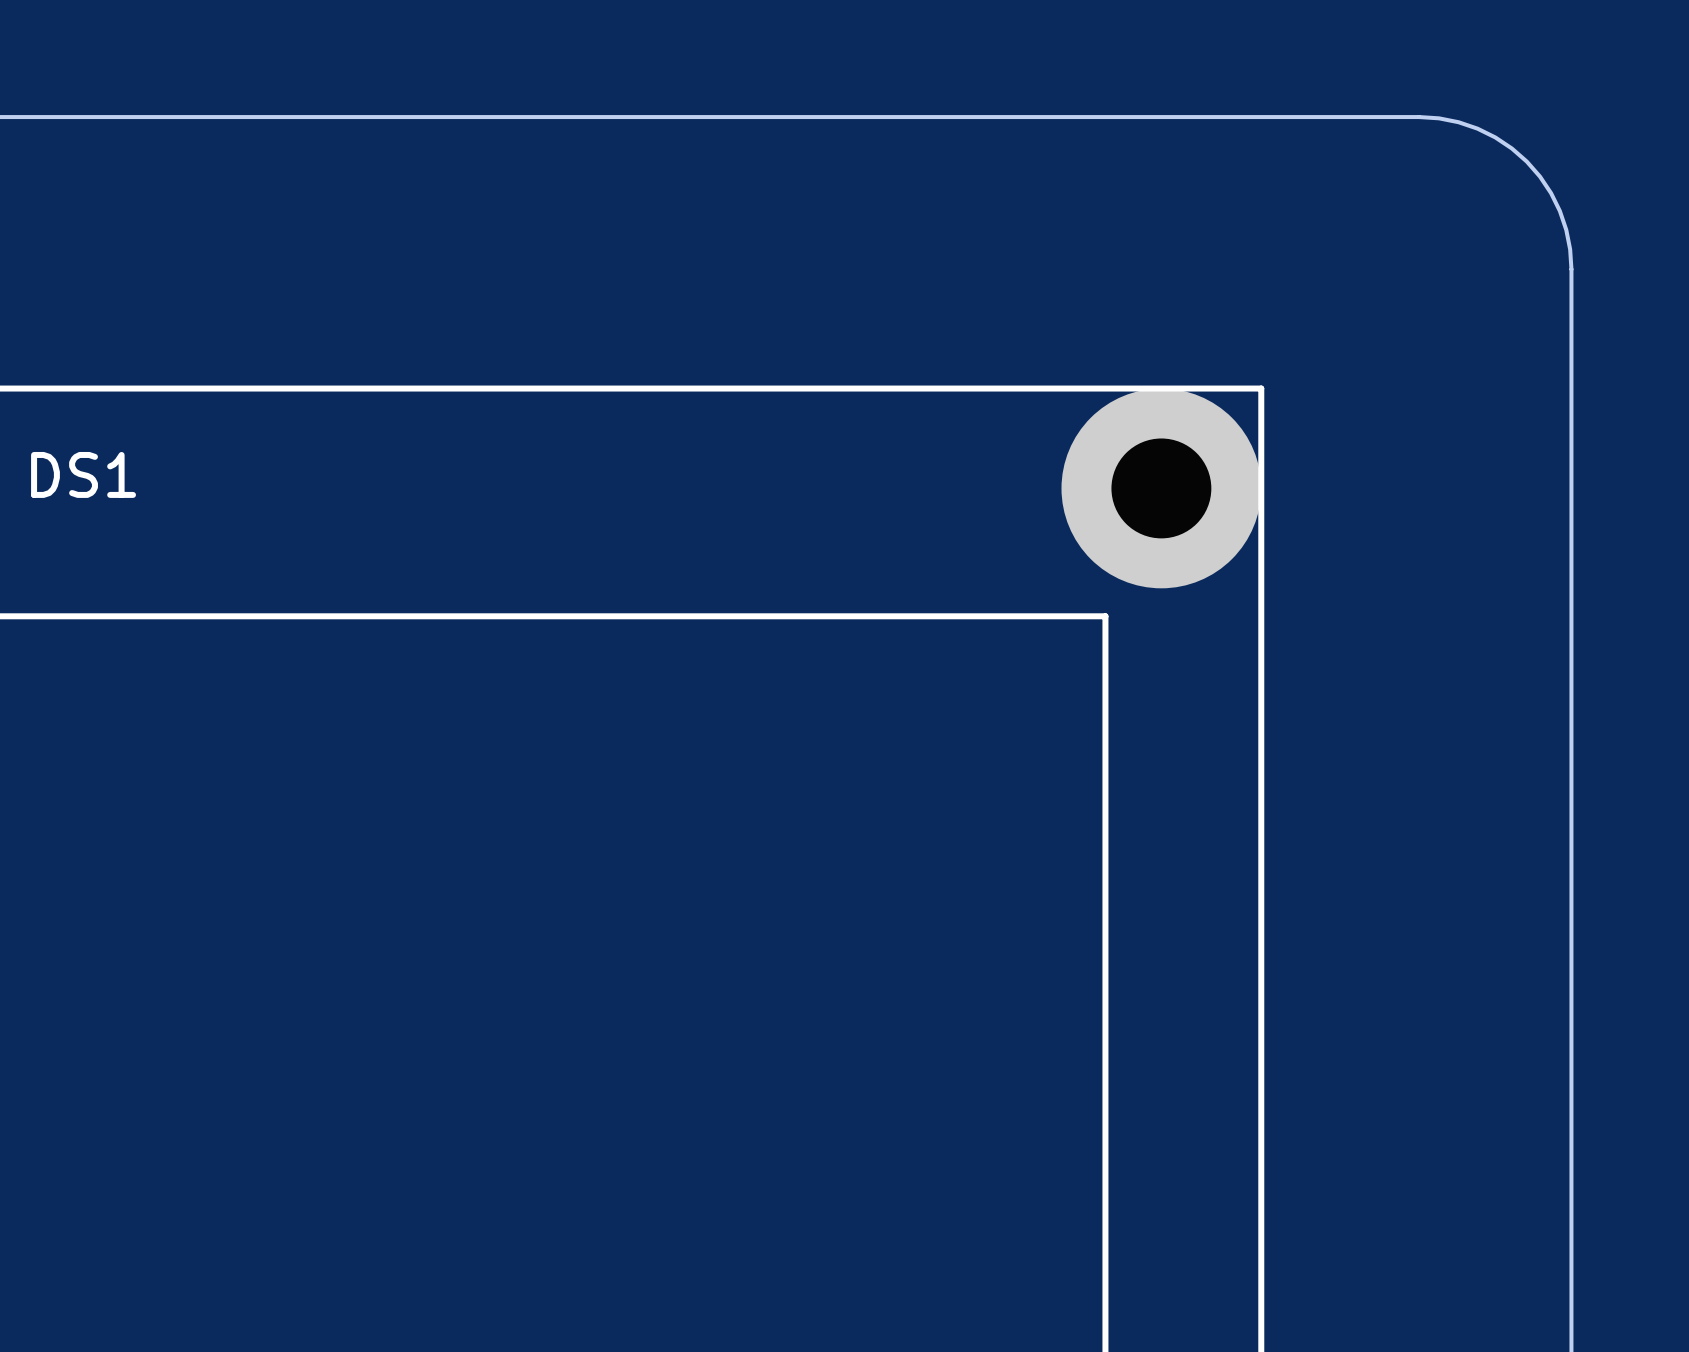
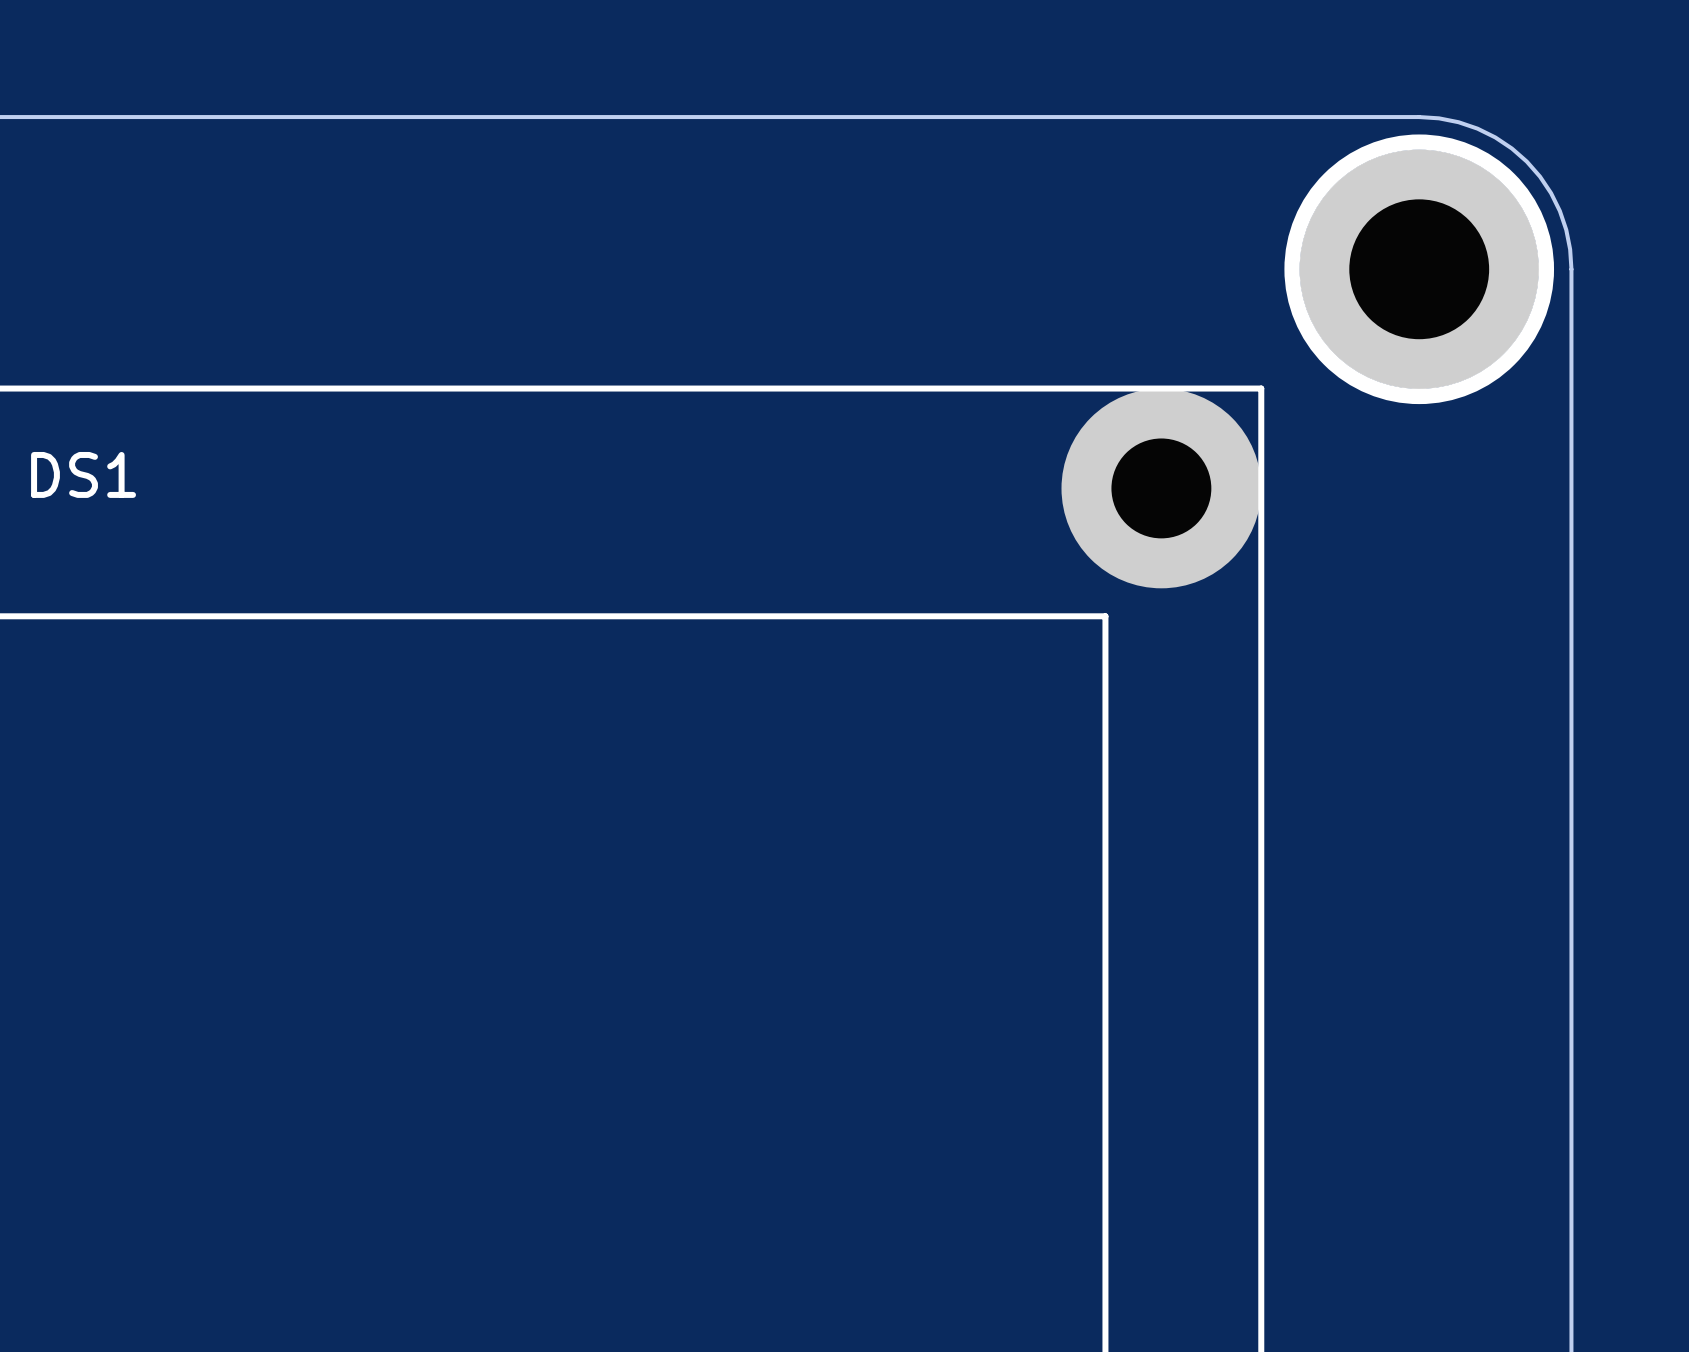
part: none -> (1419, 269)

